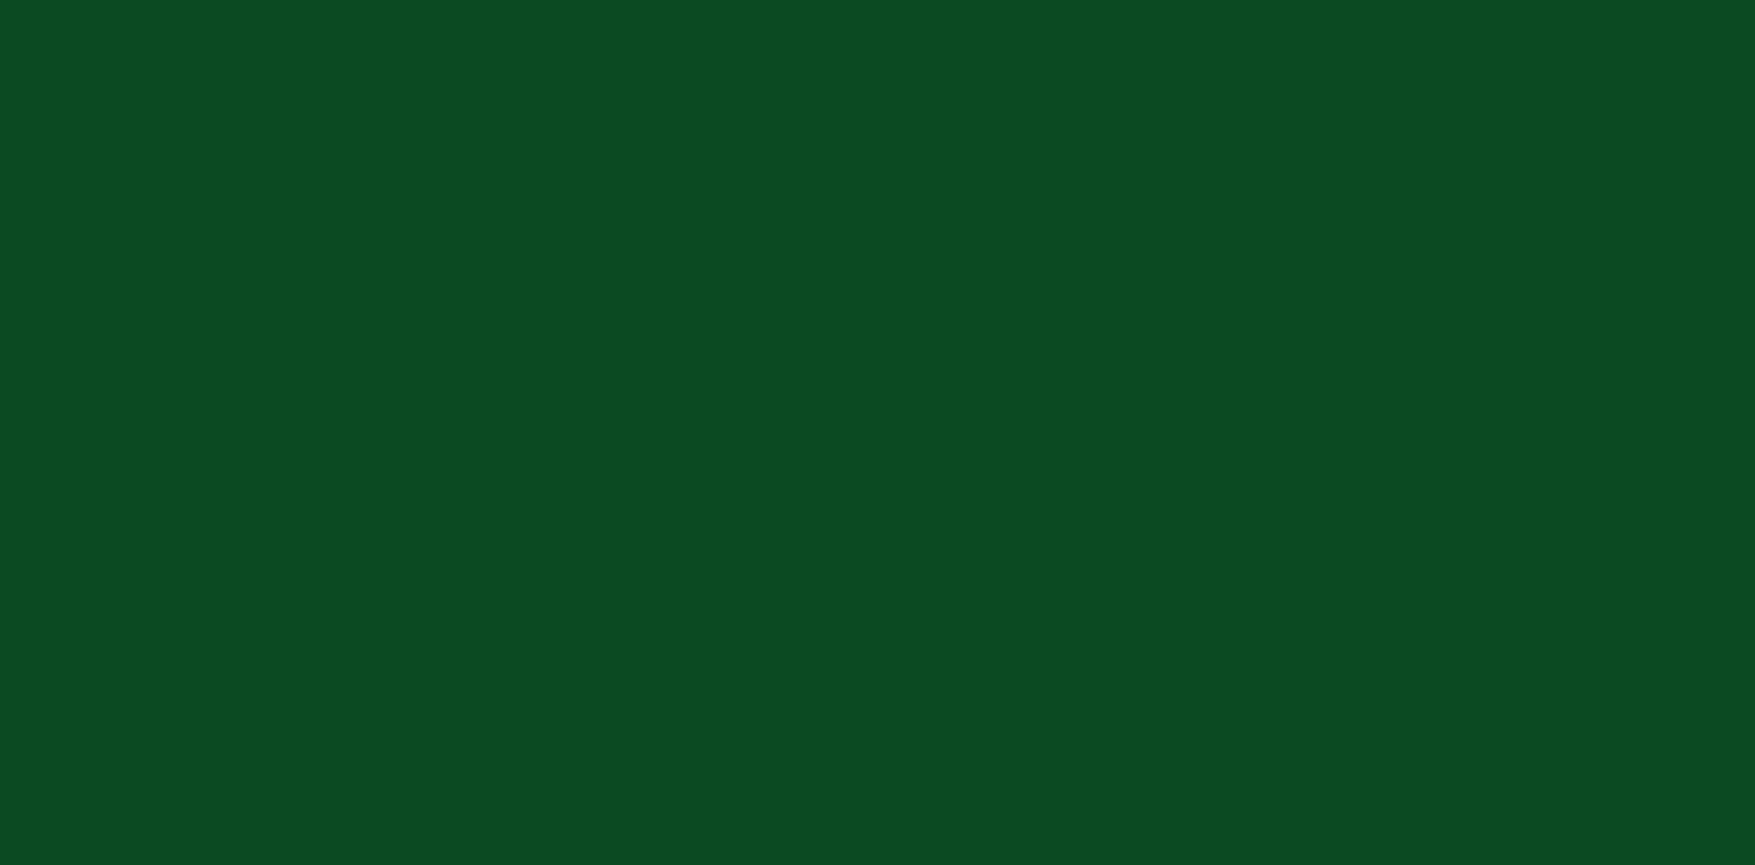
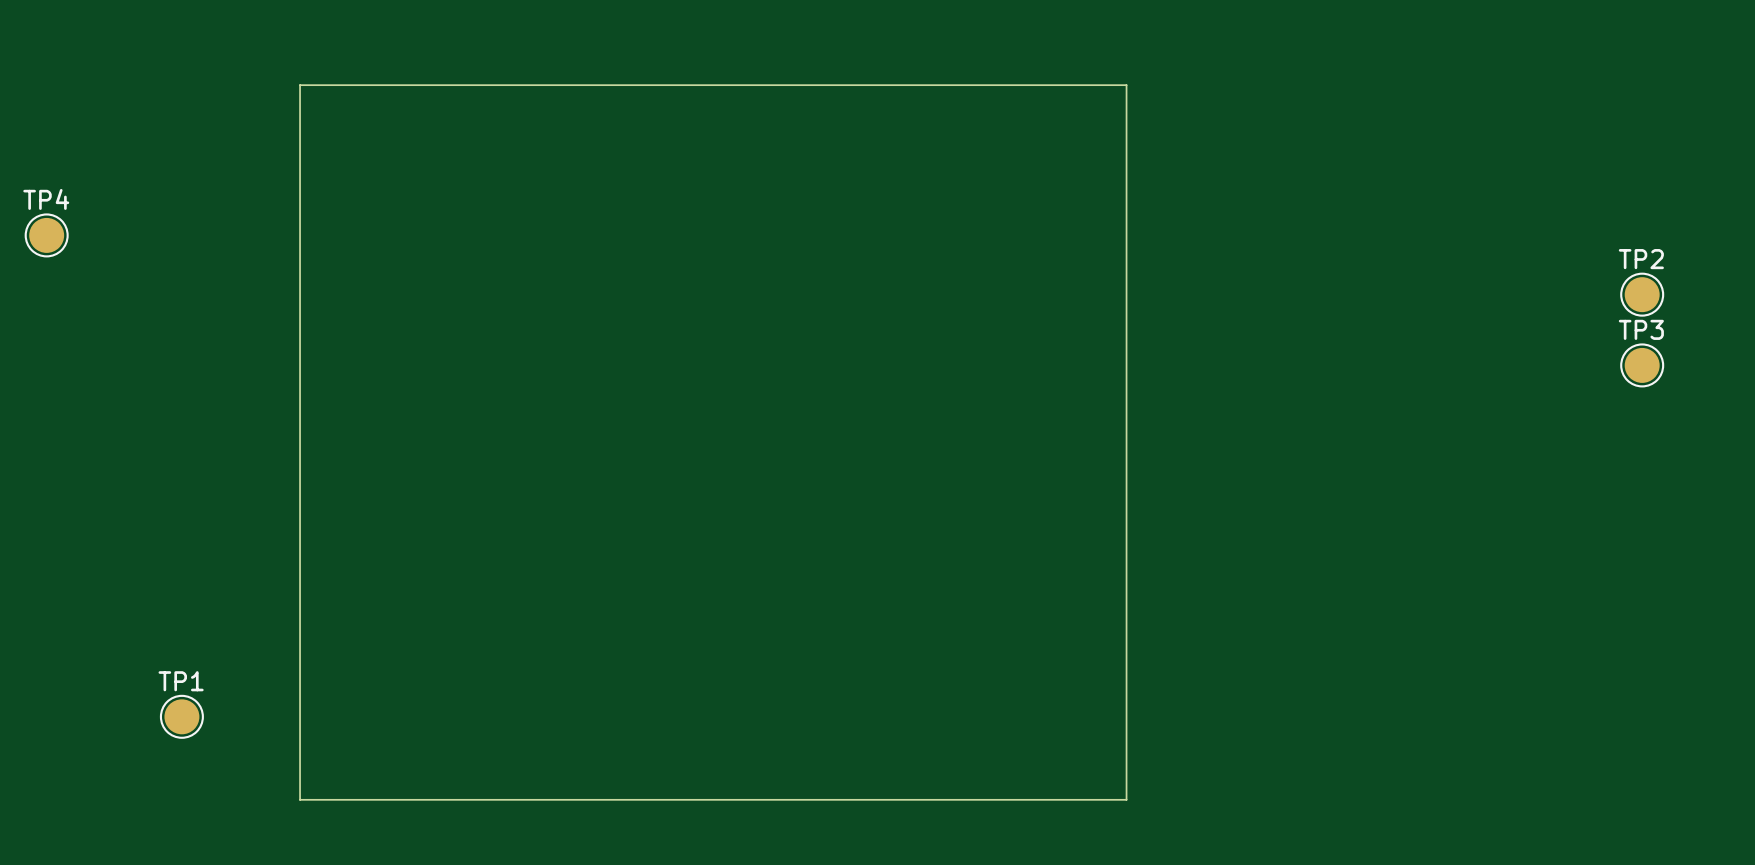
board edge: none -> (300, 85) (1126, 85) (1126, 799) (300, 799) (300, 85)
TP4: none -> (46, 235)
TP2: none -> (1642, 294)
TP3: none -> (1642, 365)
TP1: none -> (181, 716)

